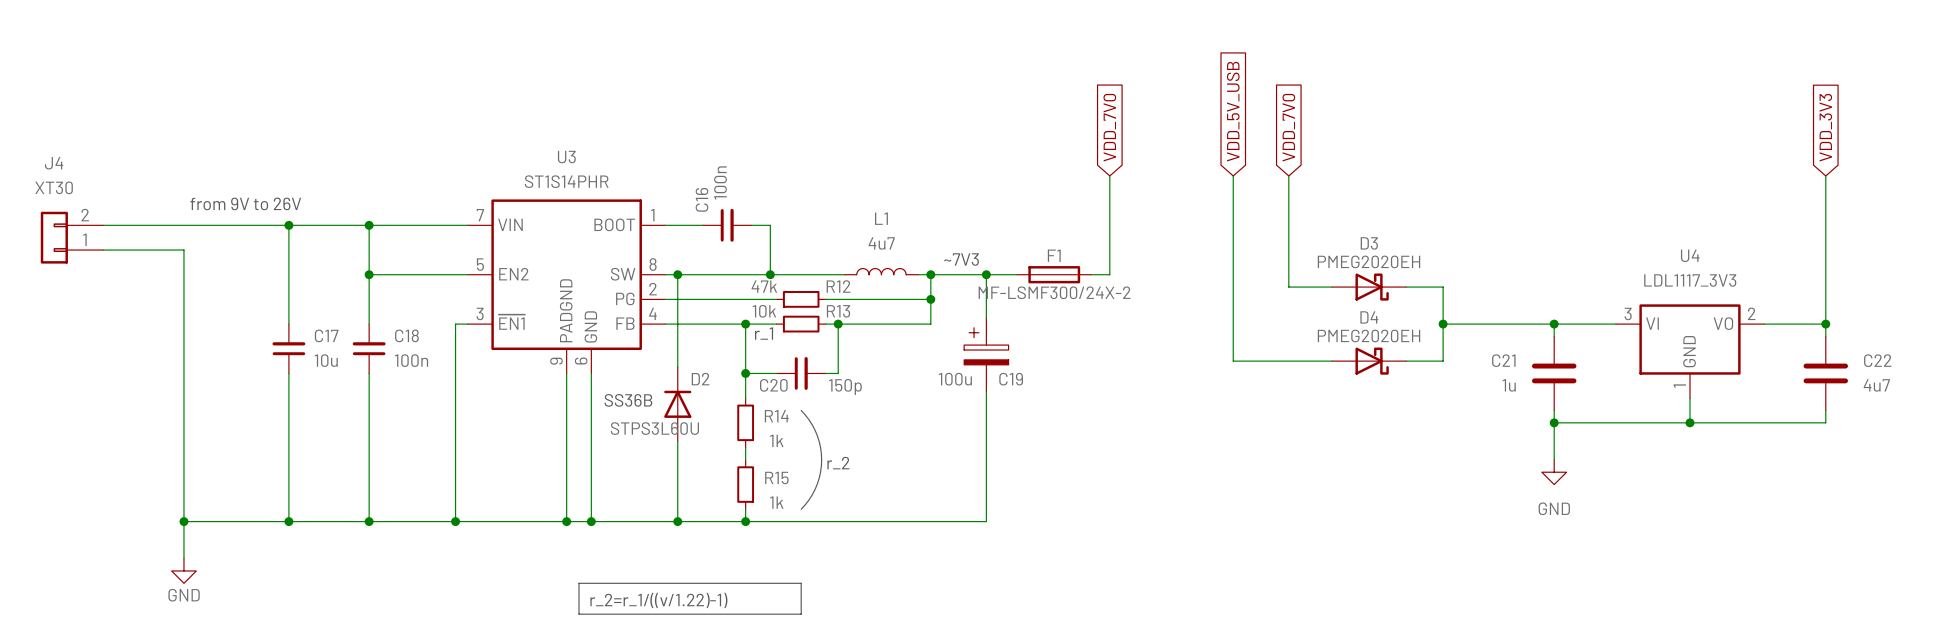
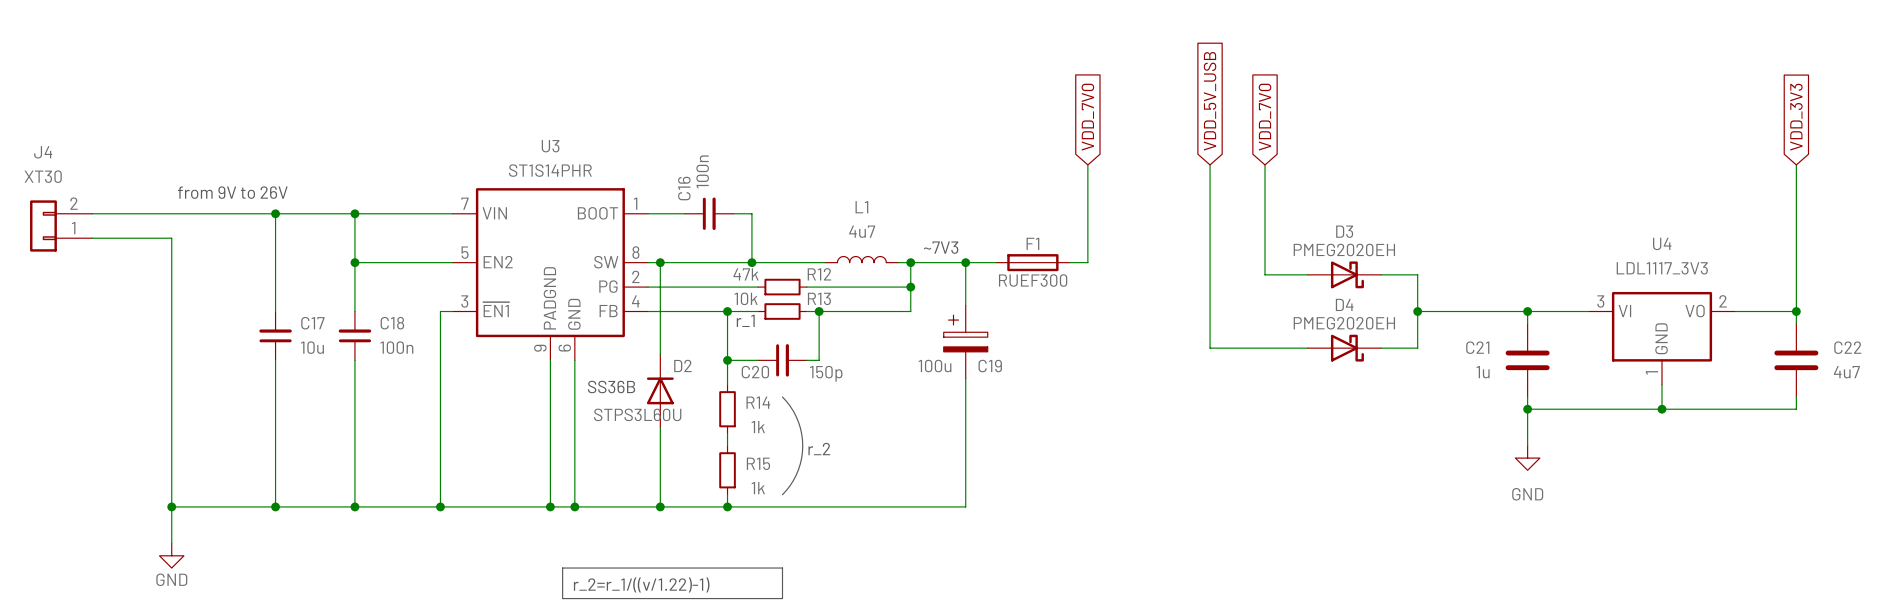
F1 value: MF-LSMF300/24X-2 (1054, 292) -> RUEF300 (1033, 280)

